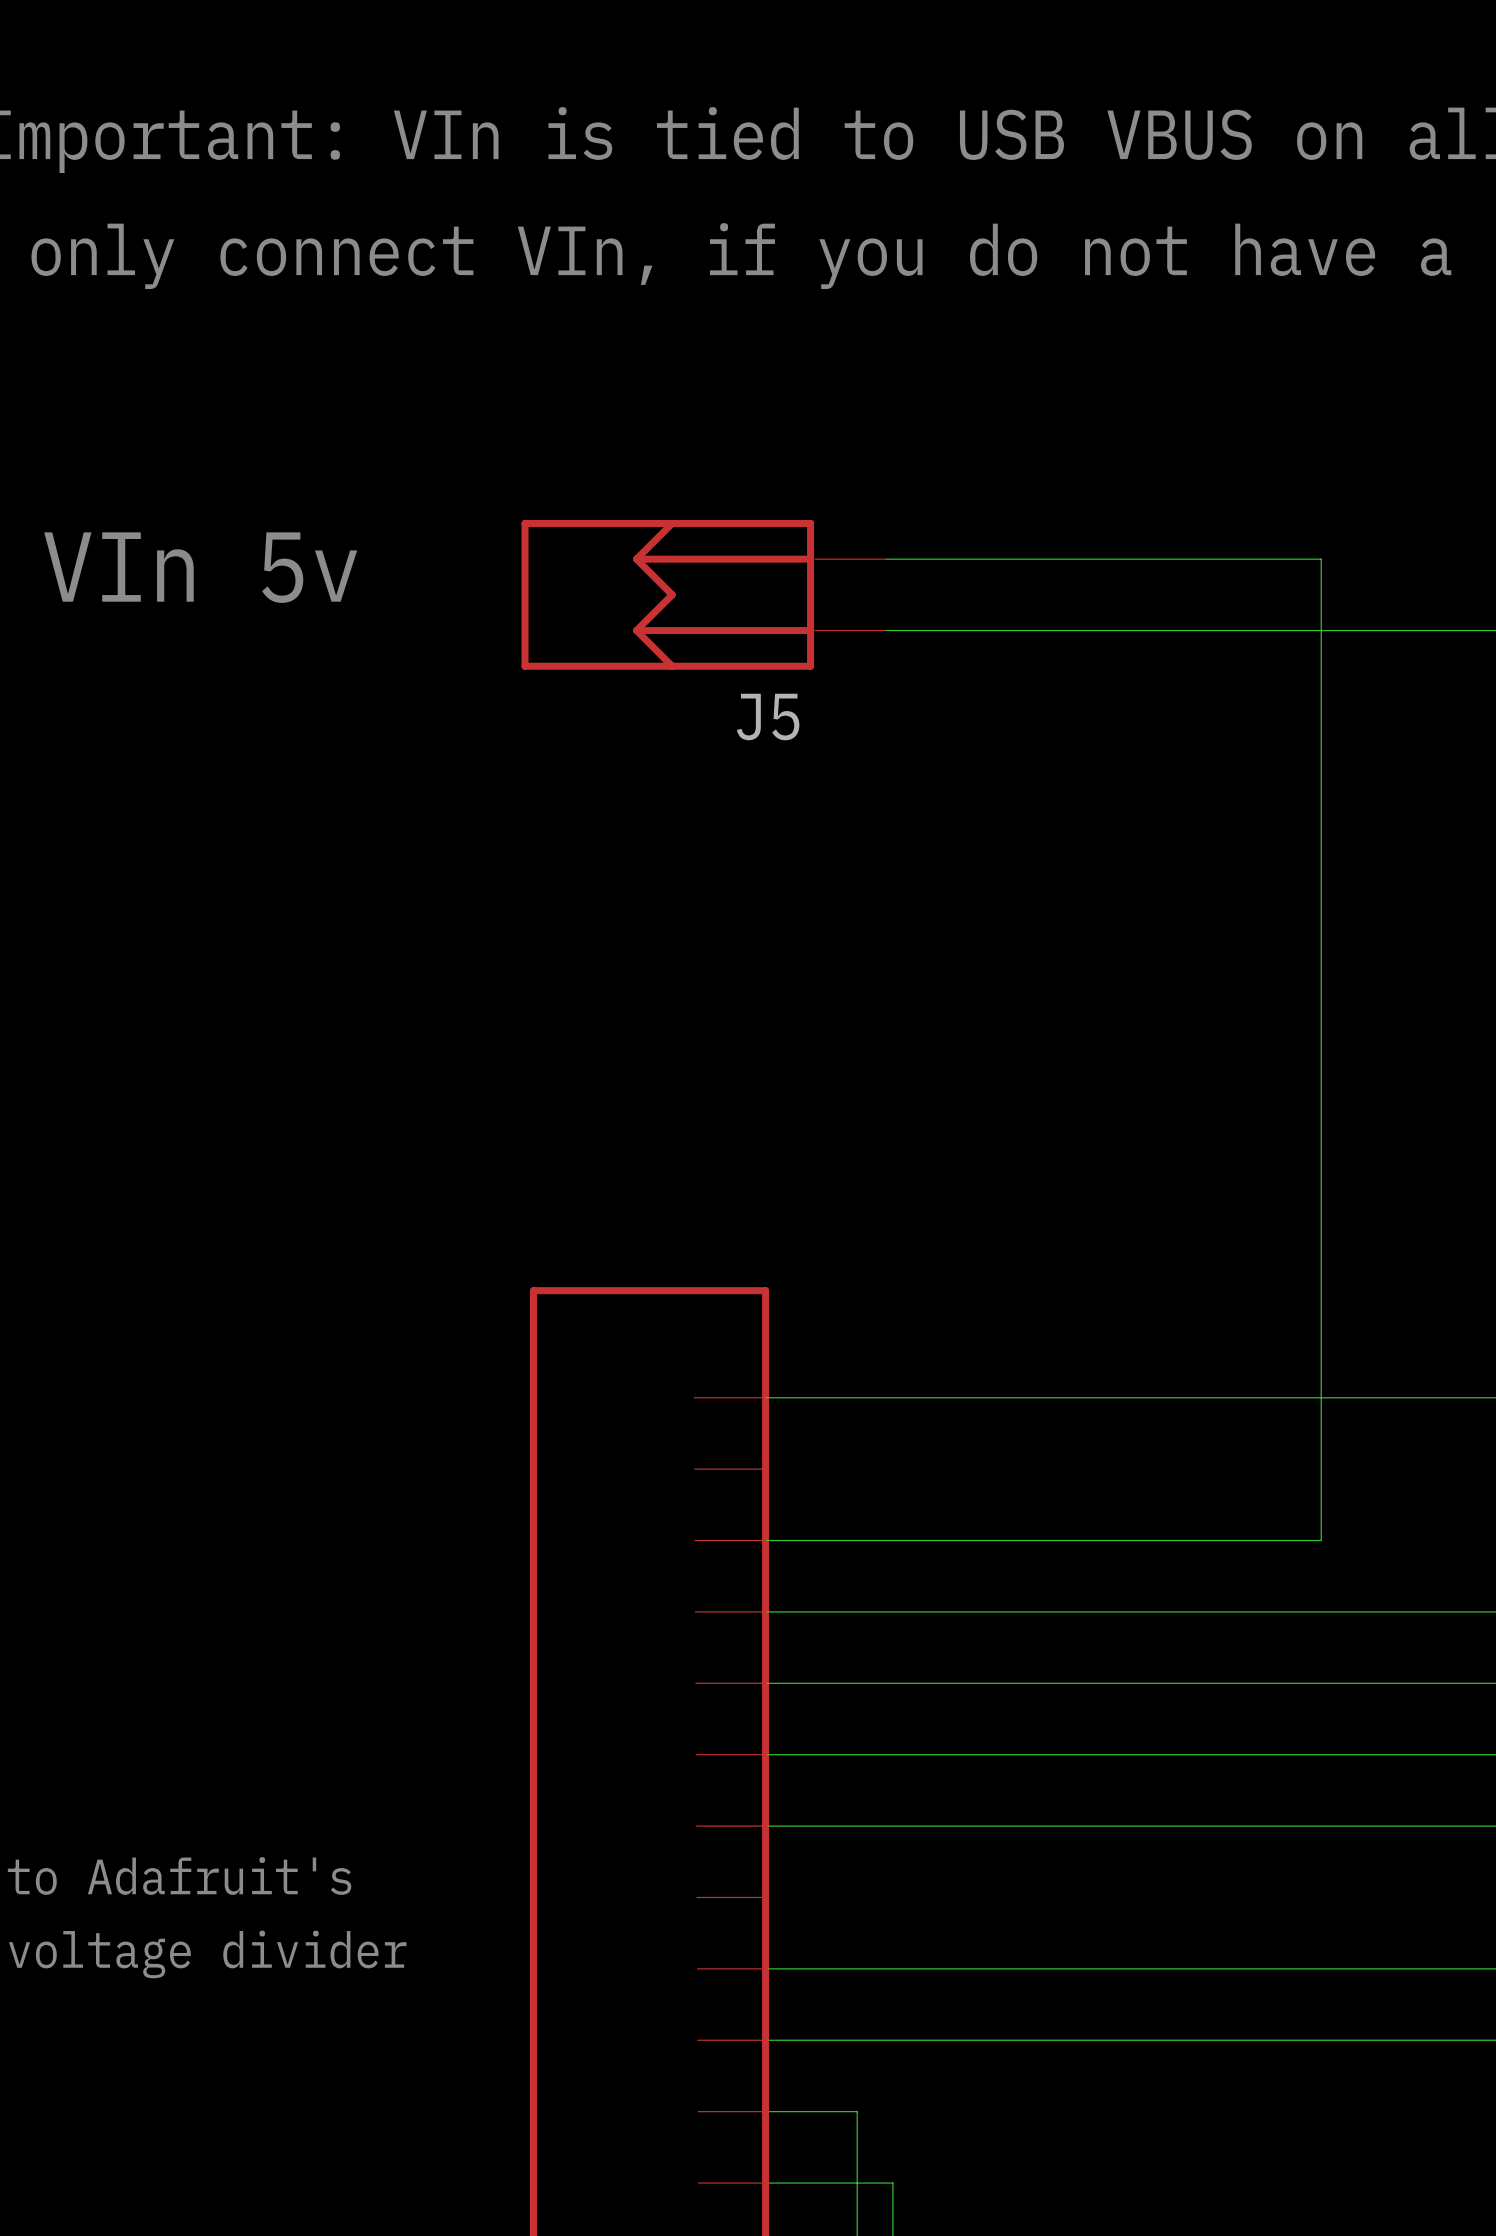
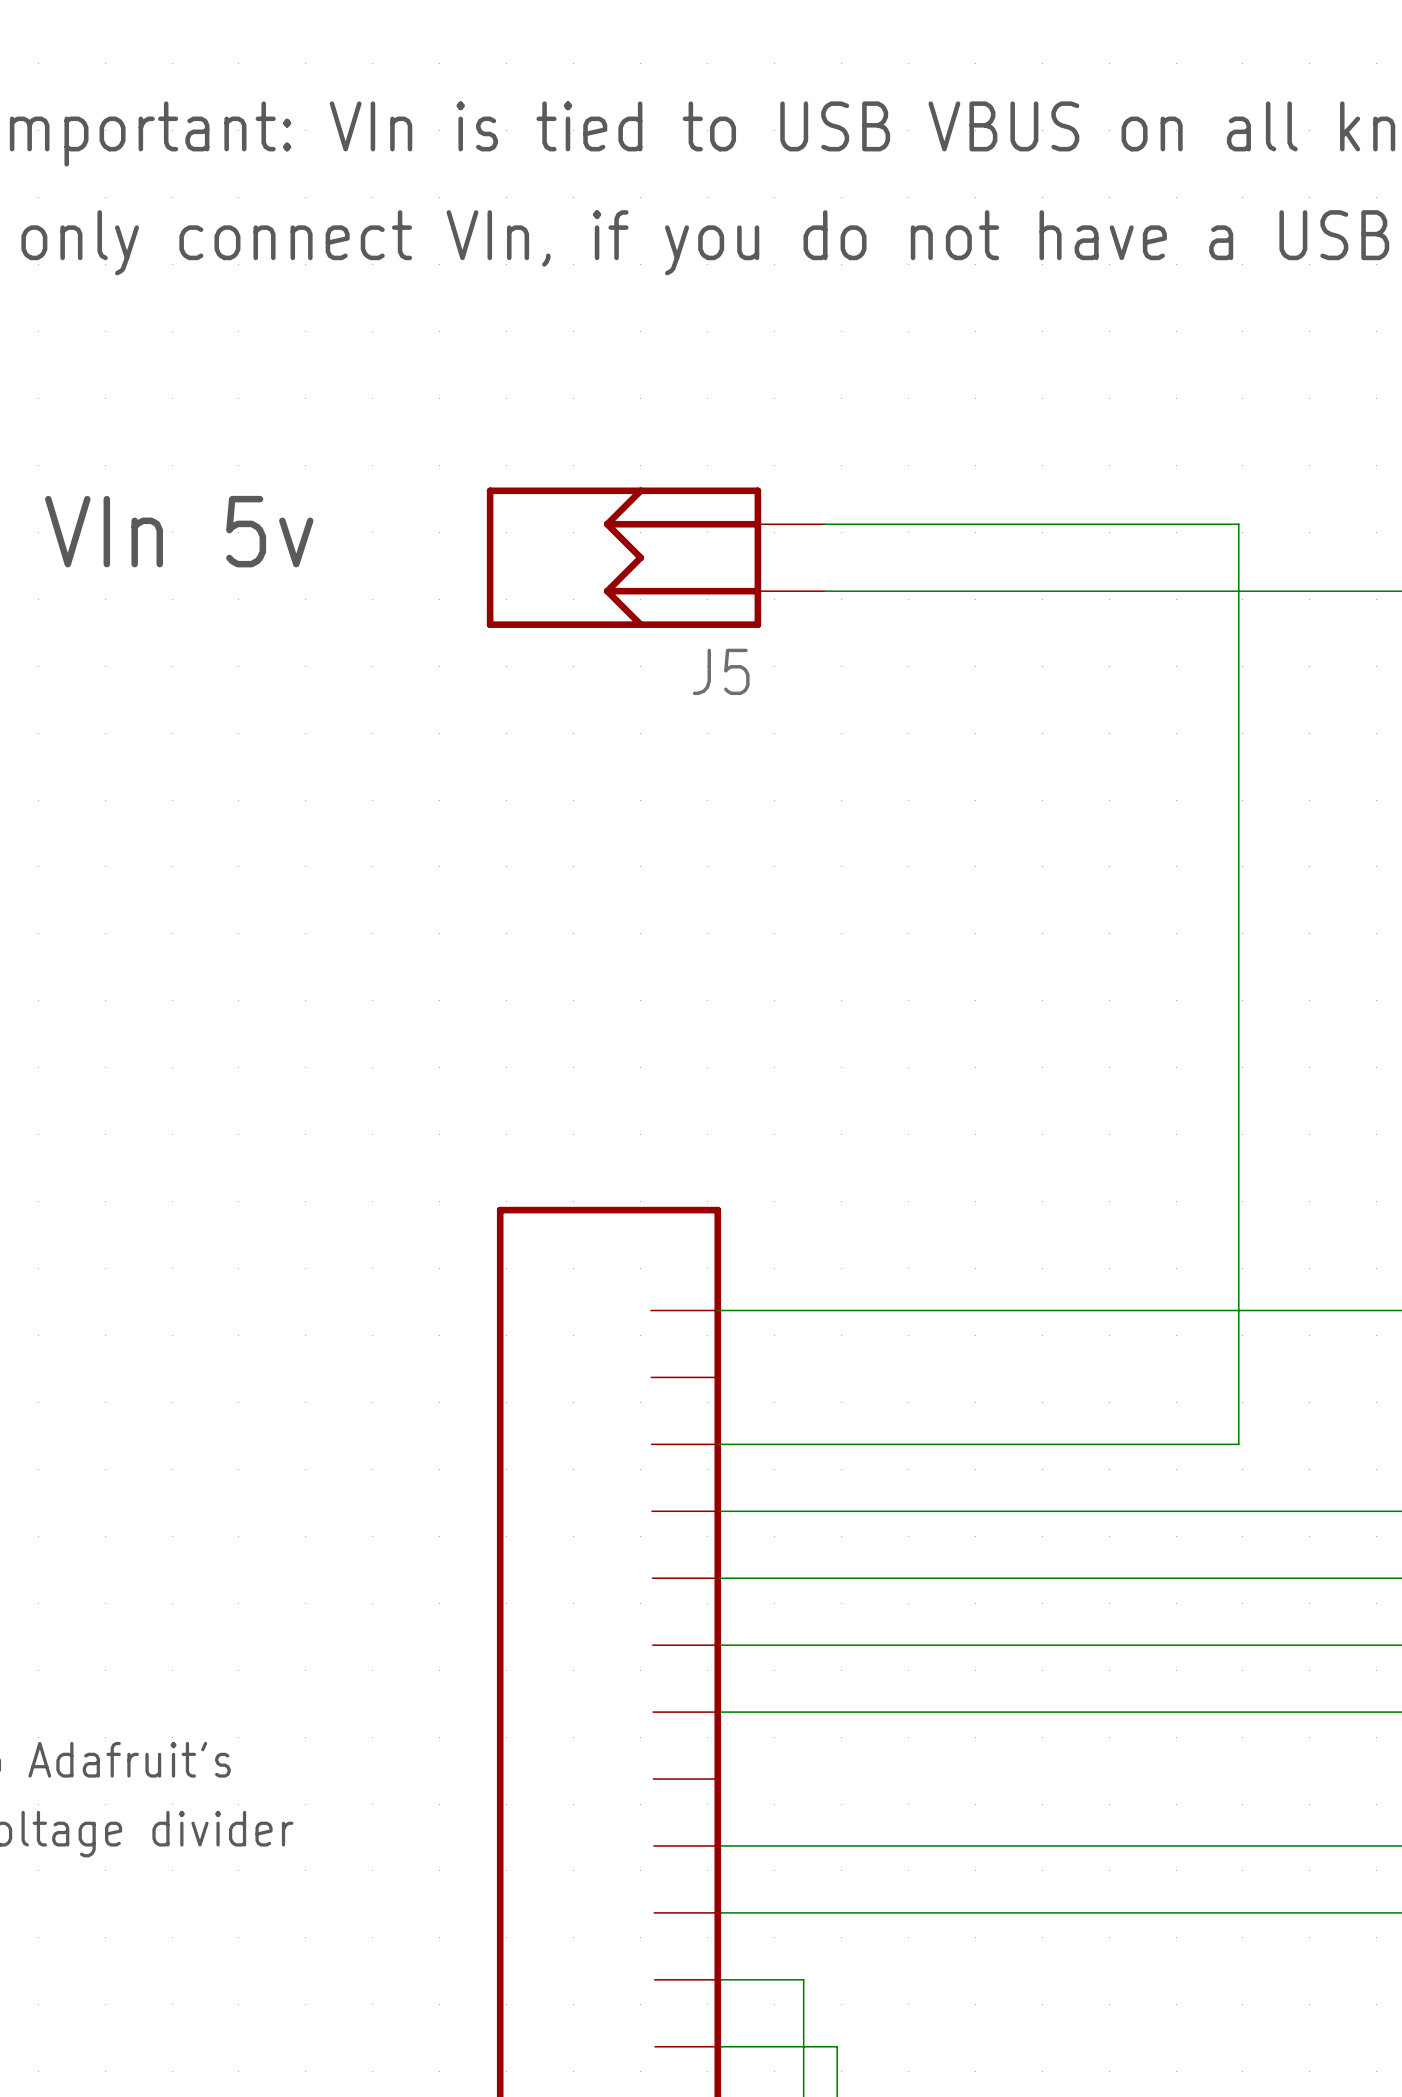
J5 symbol: [521, 519, 887, 670] -> [486, 487, 825, 628]

